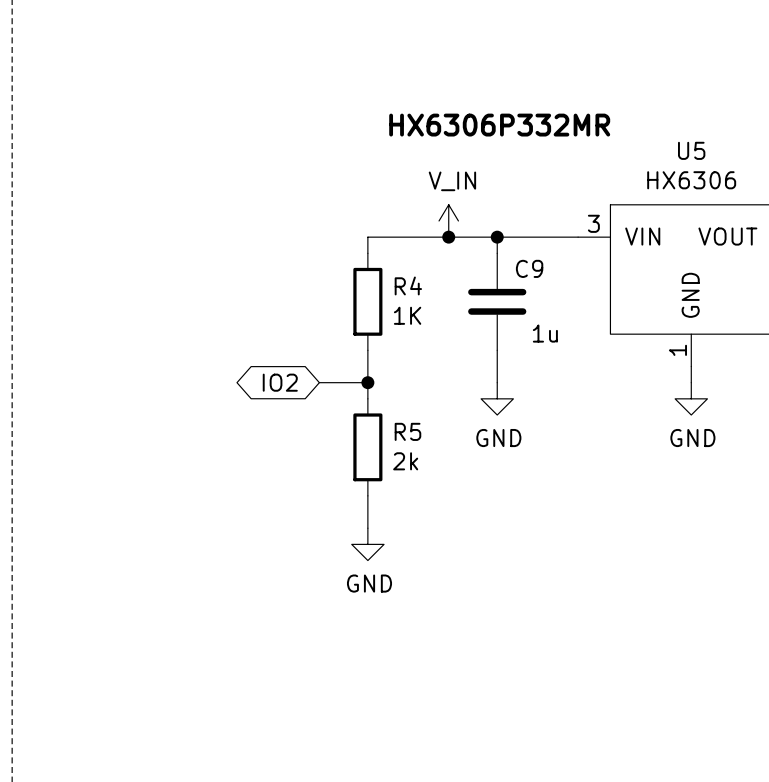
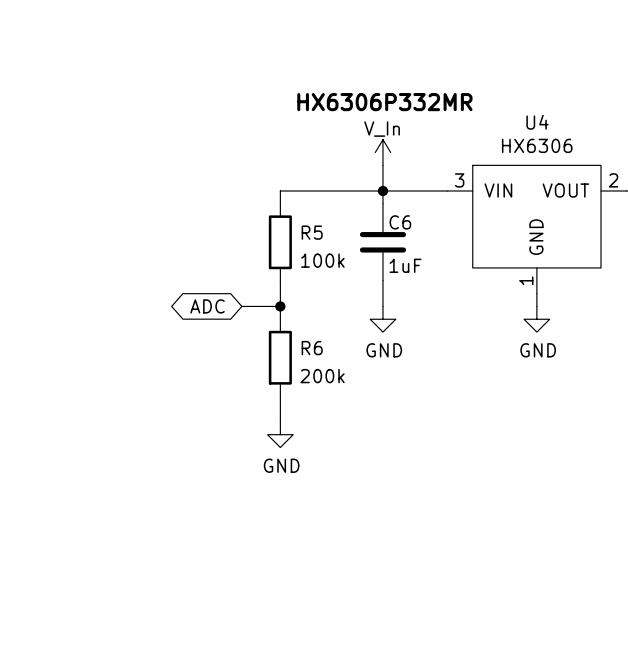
U5 name: U5 (691, 150) -> U4 (537, 122)
power symbol: none -> V_In (382, 152)
wire: none -> (382, 165) (382, 190)
power symbol: V_IN (448, 220) -> none
junction: (448, 237) -> none
C9 name: C9 (529, 268) -> C6 (400, 222)
R4 name: R4 (408, 285) -> R5 (312, 232)
R4 value: 1K (407, 315) -> 100k (322, 260)
C9 value: 1u (545, 333) -> 1uF (405, 265)
global label: IO2 (280, 382) -> ADC (207, 306)
R5 name: R5 (407, 431) -> R6 (312, 348)
R5 value: 2k (405, 461) -> 200k (322, 376)

